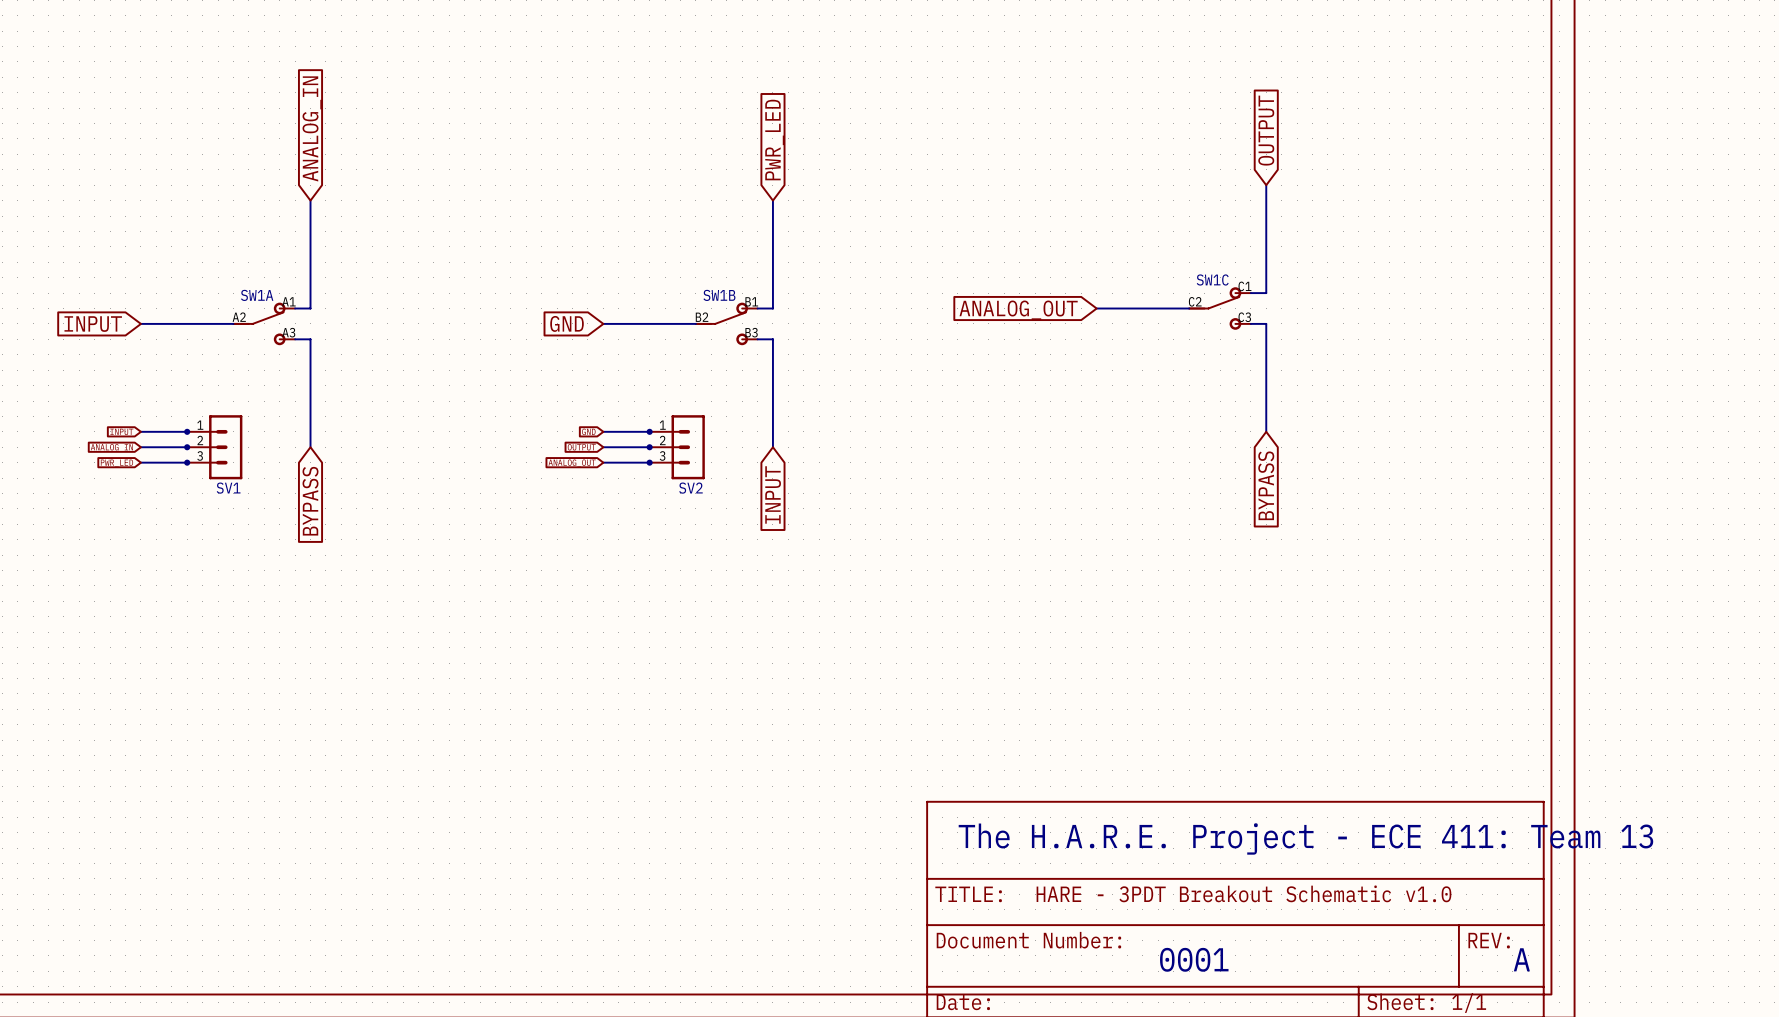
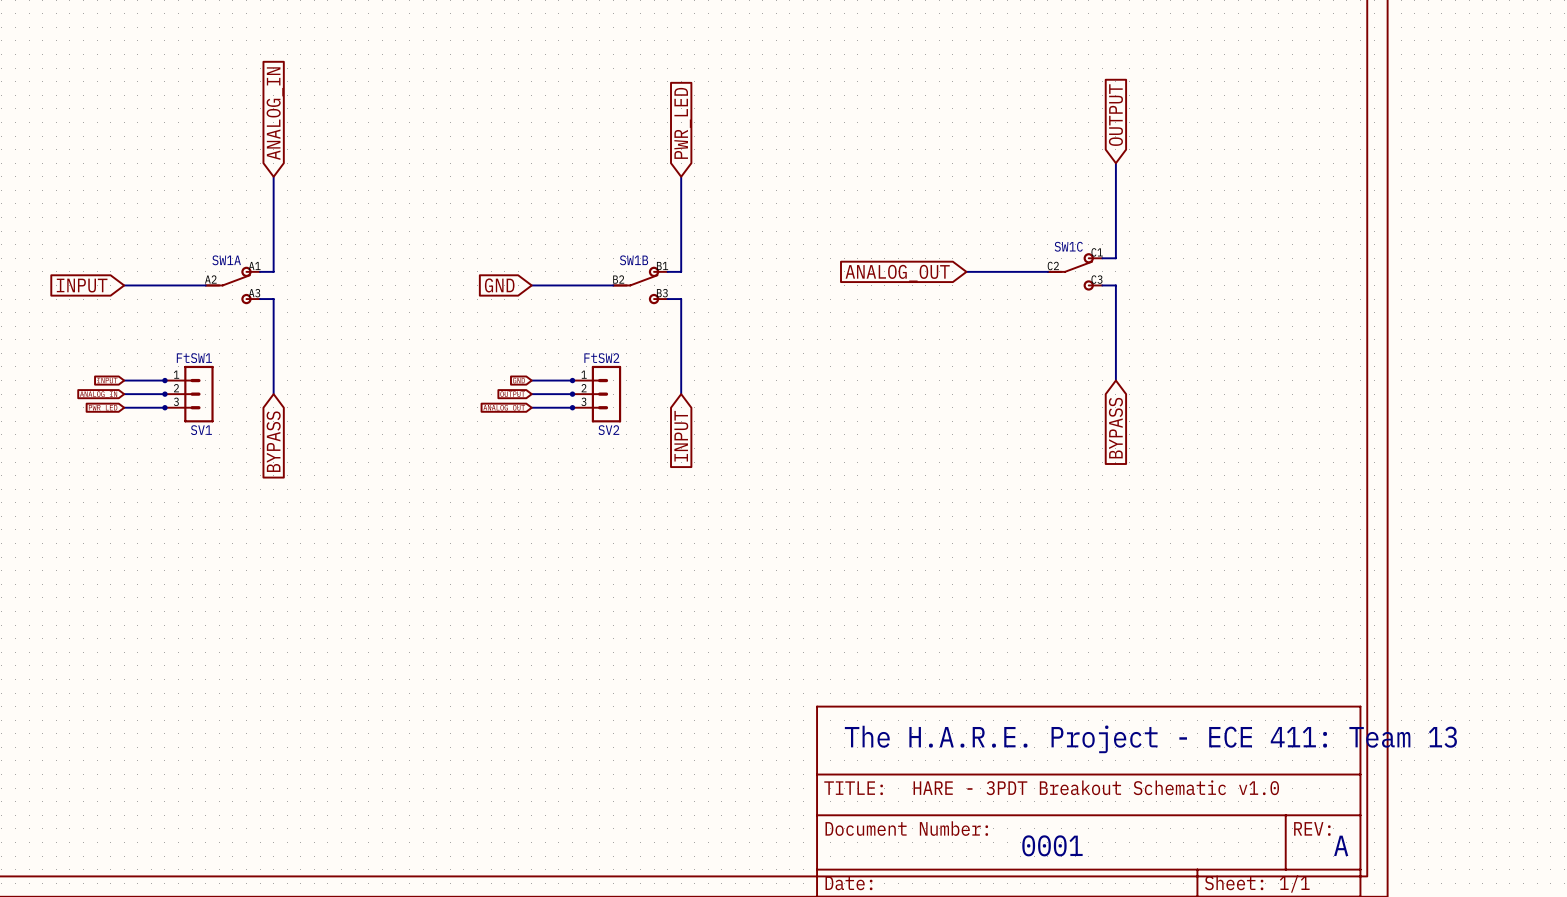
SV1 value: none -> FtSW1 (194, 358)
SV2 value: none -> FtSW2 (601, 358)

